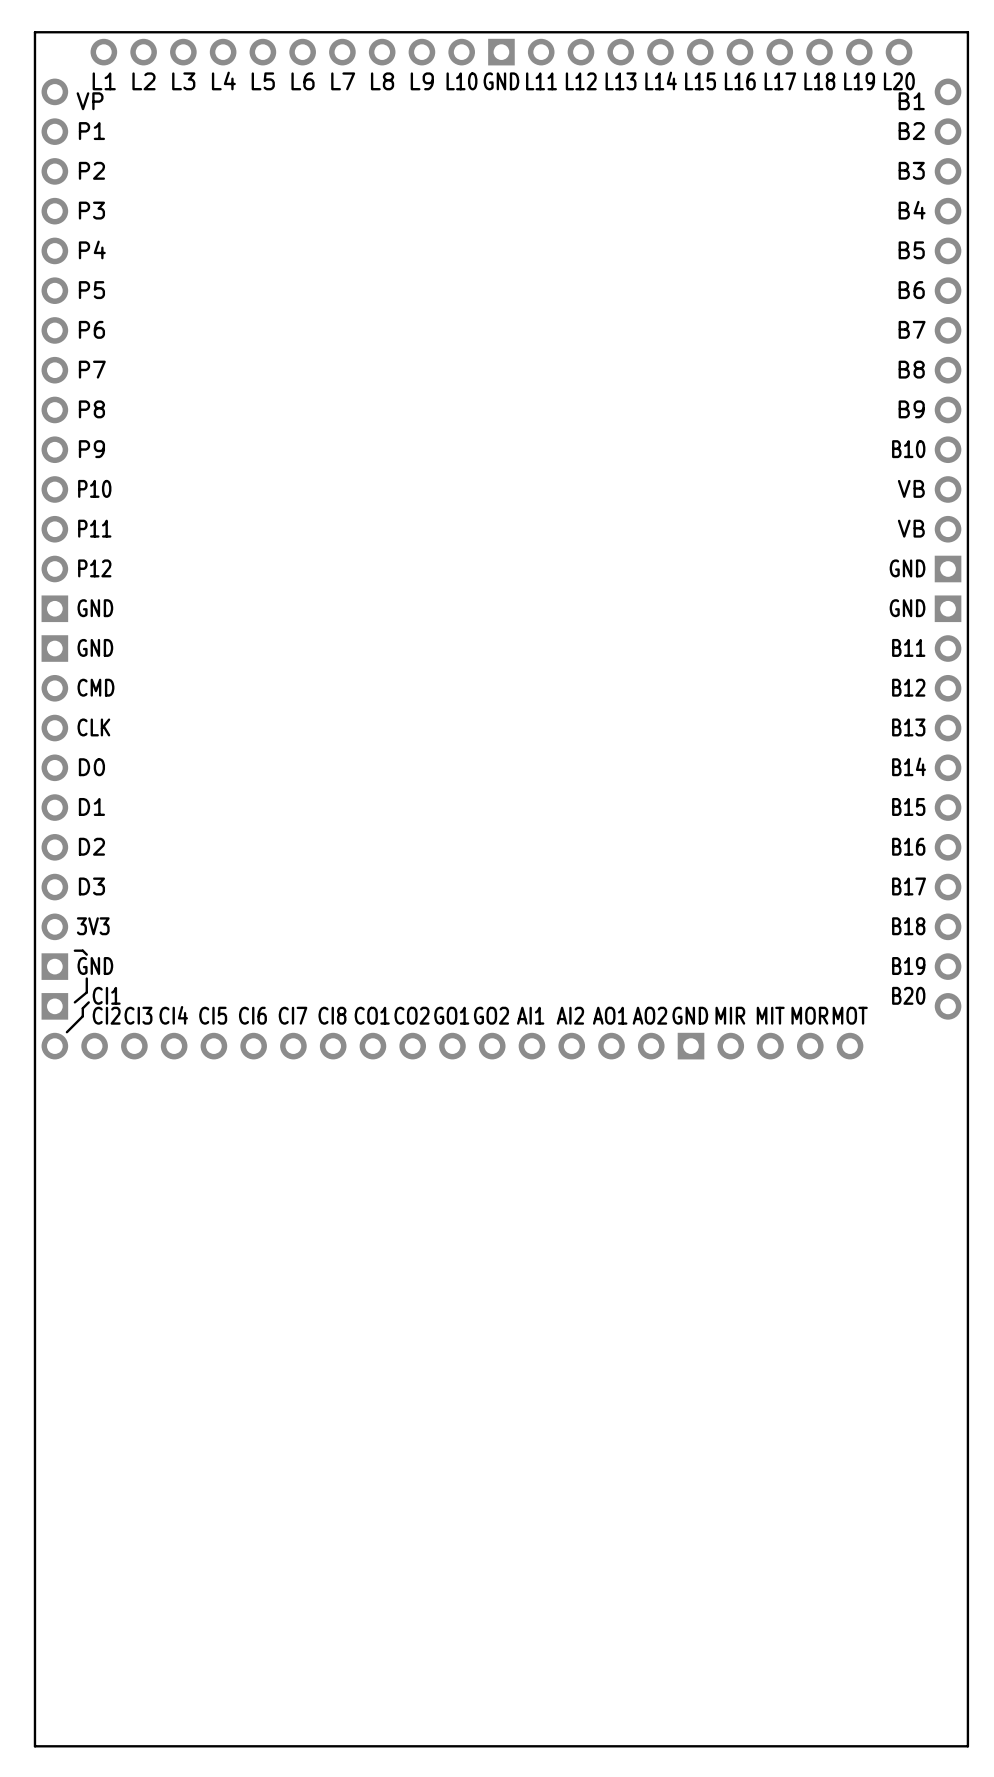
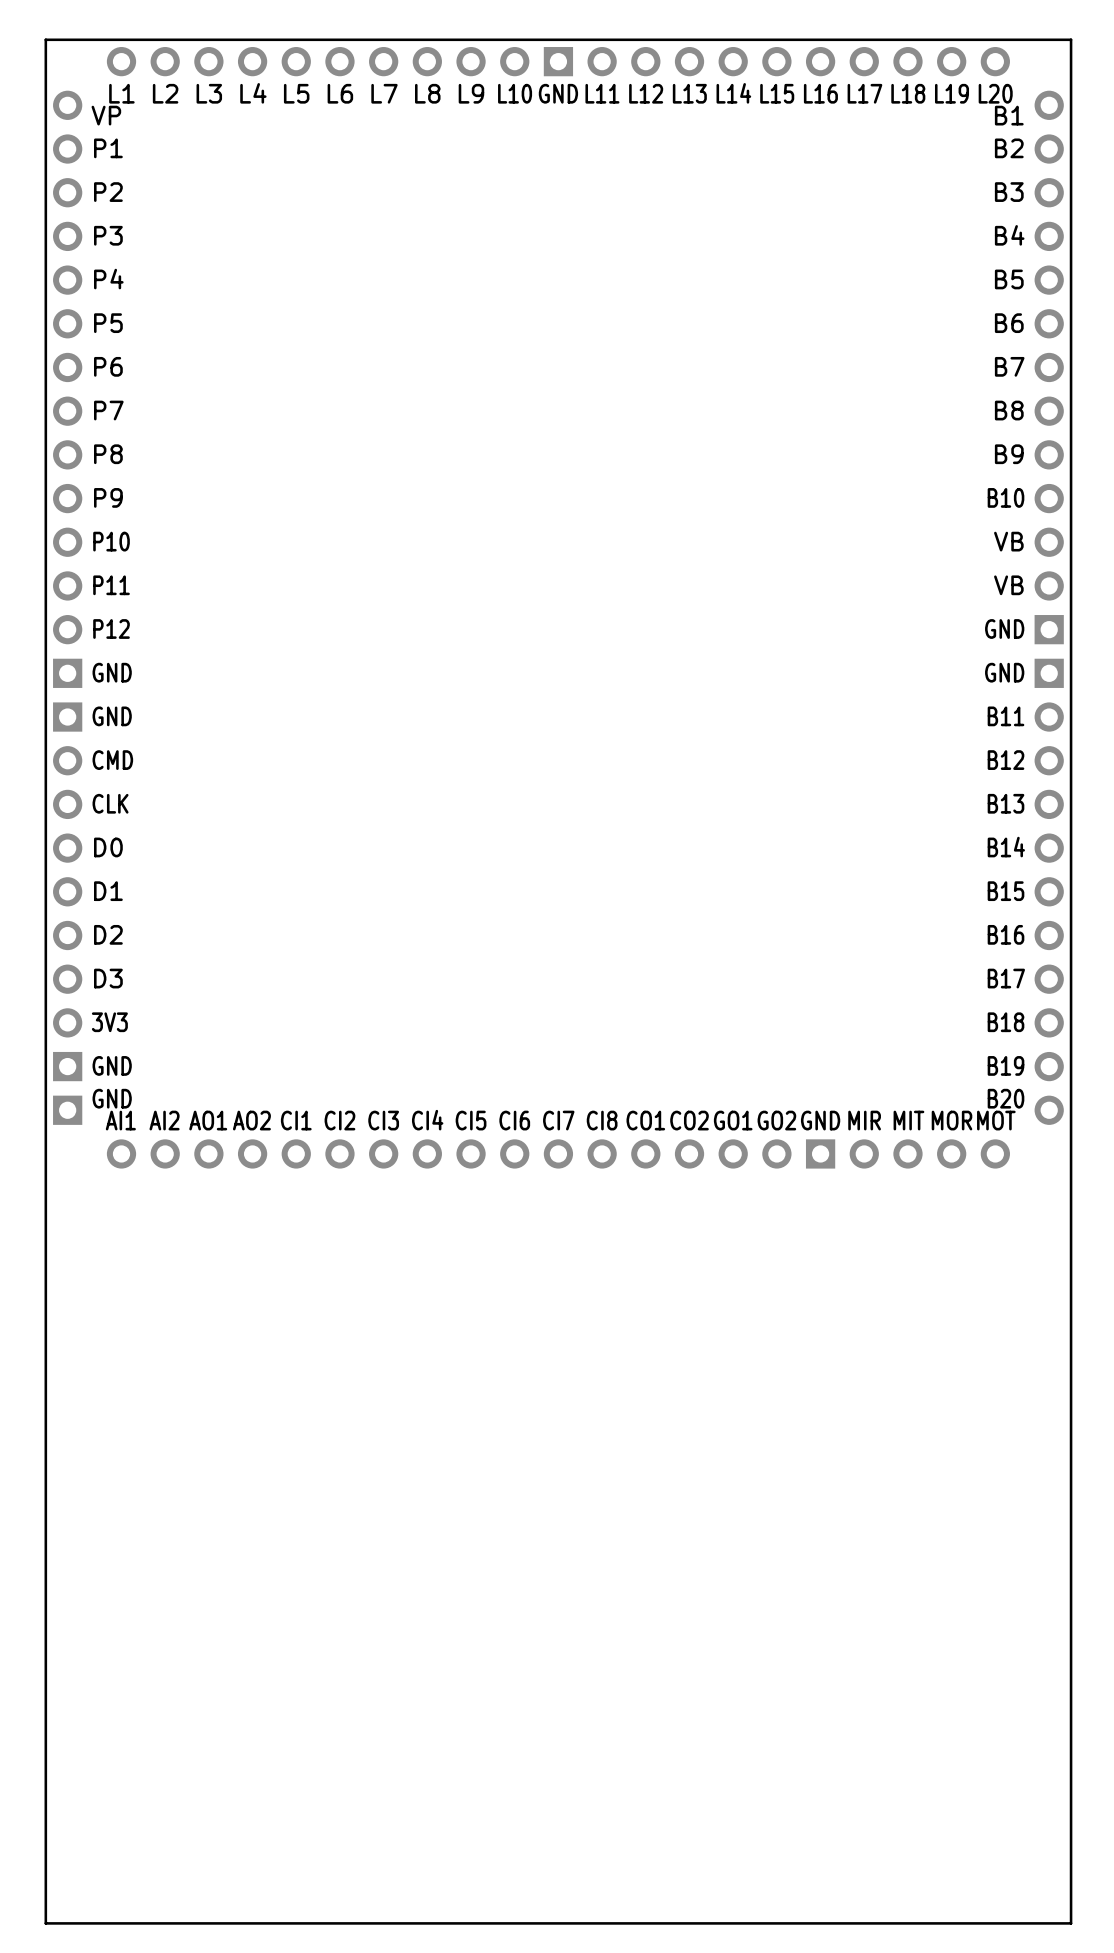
line: (74, 950) (82, 950) (86, 954) -> none
line: (86, 978) (86, 992) (74, 1002) -> none
text: none -> GND (112, 1098)
text position: CI1 (106, 995) -> CI1 (296, 1120)
line: (88, 1002) (82, 1008) (82, 1016) (66, 1032) -> none
text: none -> AI1 (120, 1120)
text position: CI2 (106, 1015) -> CI2 (339, 1120)
text position: CI3 (138, 1015) -> CI3 (383, 1120)
text: none -> AI2 (164, 1120)
text position: CI4 (173, 1015) -> CI4 (427, 1120)
text: none -> AO1 (208, 1120)
text position: CI5 (213, 1015) -> CI5 (471, 1120)
text: none -> AO2 (251, 1120)
text position: CI6 (252, 1015) -> CI6 (514, 1120)
text position: CI7 (293, 1015) -> CI7 (558, 1120)
text position: CI8 (332, 1015) -> CI8 (602, 1120)
text position: CO1 (372, 1015) -> CO1 (645, 1120)
text position: CO2 (411, 1015) -> CO2 (689, 1120)
text position: GO1 (451, 1015) -> GO1 (733, 1120)
text position: GO2 (491, 1015) -> GO2 (776, 1120)
text: AI1 (530, 1015) -> none
text: AI2 (570, 1015) -> none
text: AO1 (610, 1015) -> none
text: AO2 (649, 1015) -> none
text position: GND (690, 1015) -> GND (820, 1120)
text position: MIR (730, 1015) -> MIR (864, 1120)
text position: MIT (770, 1015) -> MIT (908, 1120)
text position: MOR (809, 1015) -> MOR (952, 1120)
text position: MOT (850, 1015) -> MOT (996, 1120)
part position: (452, 1046) -> (558, 1153)

